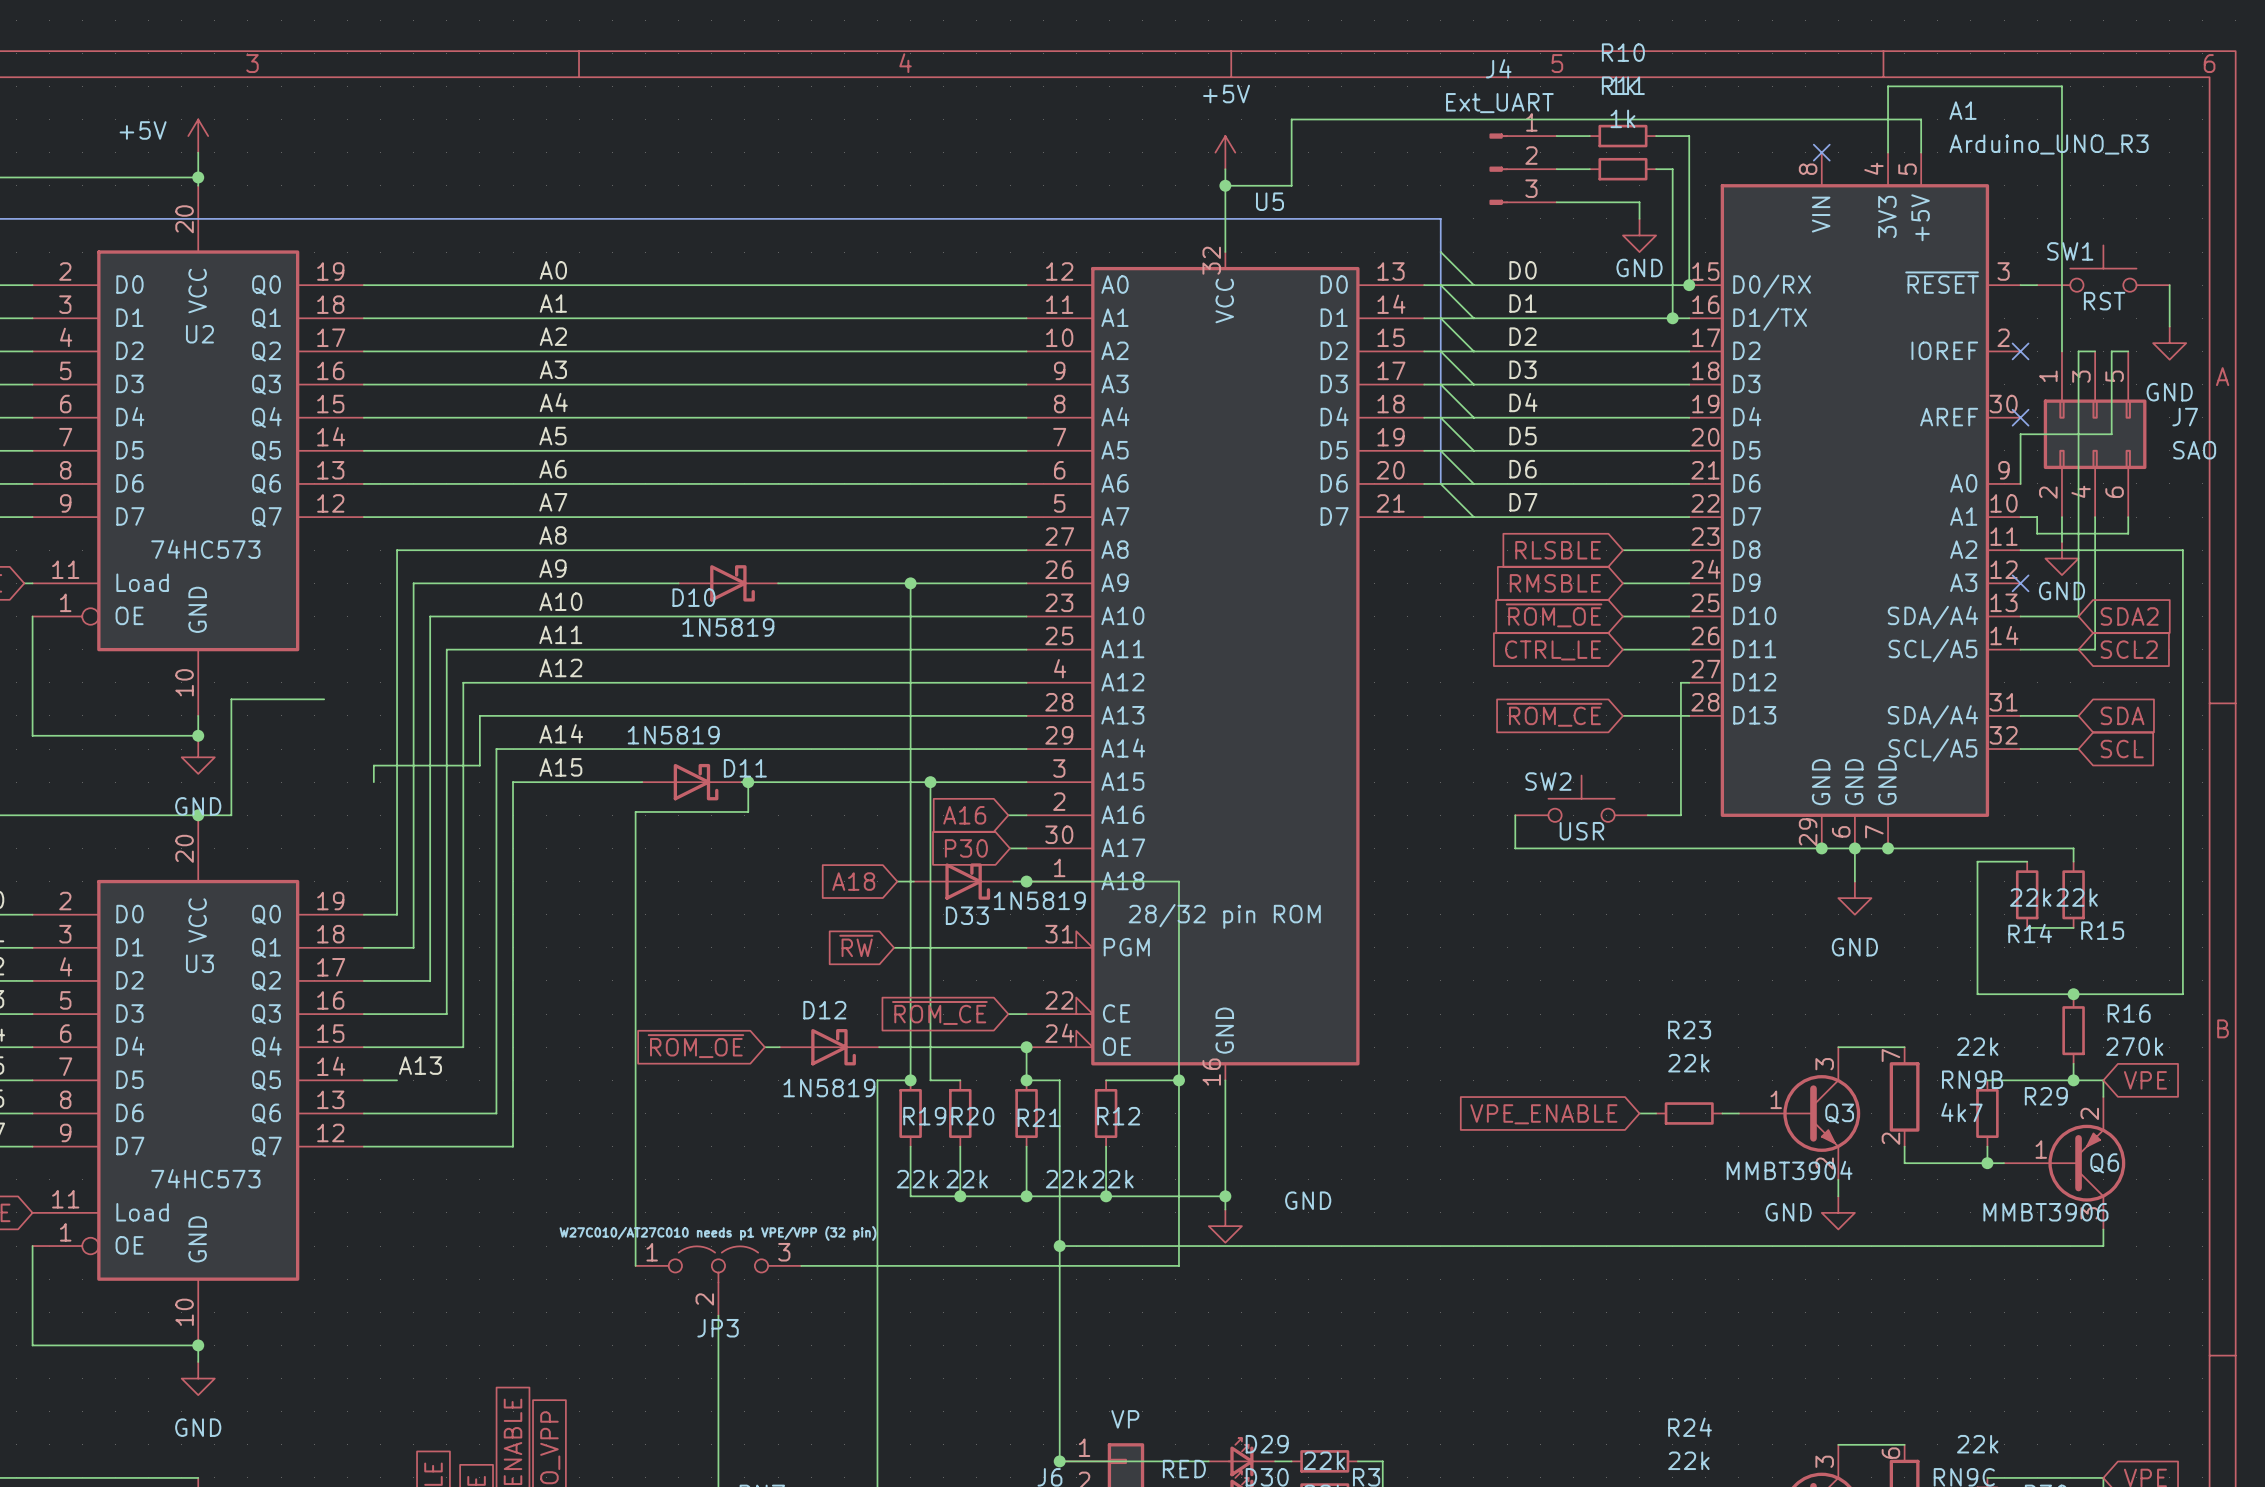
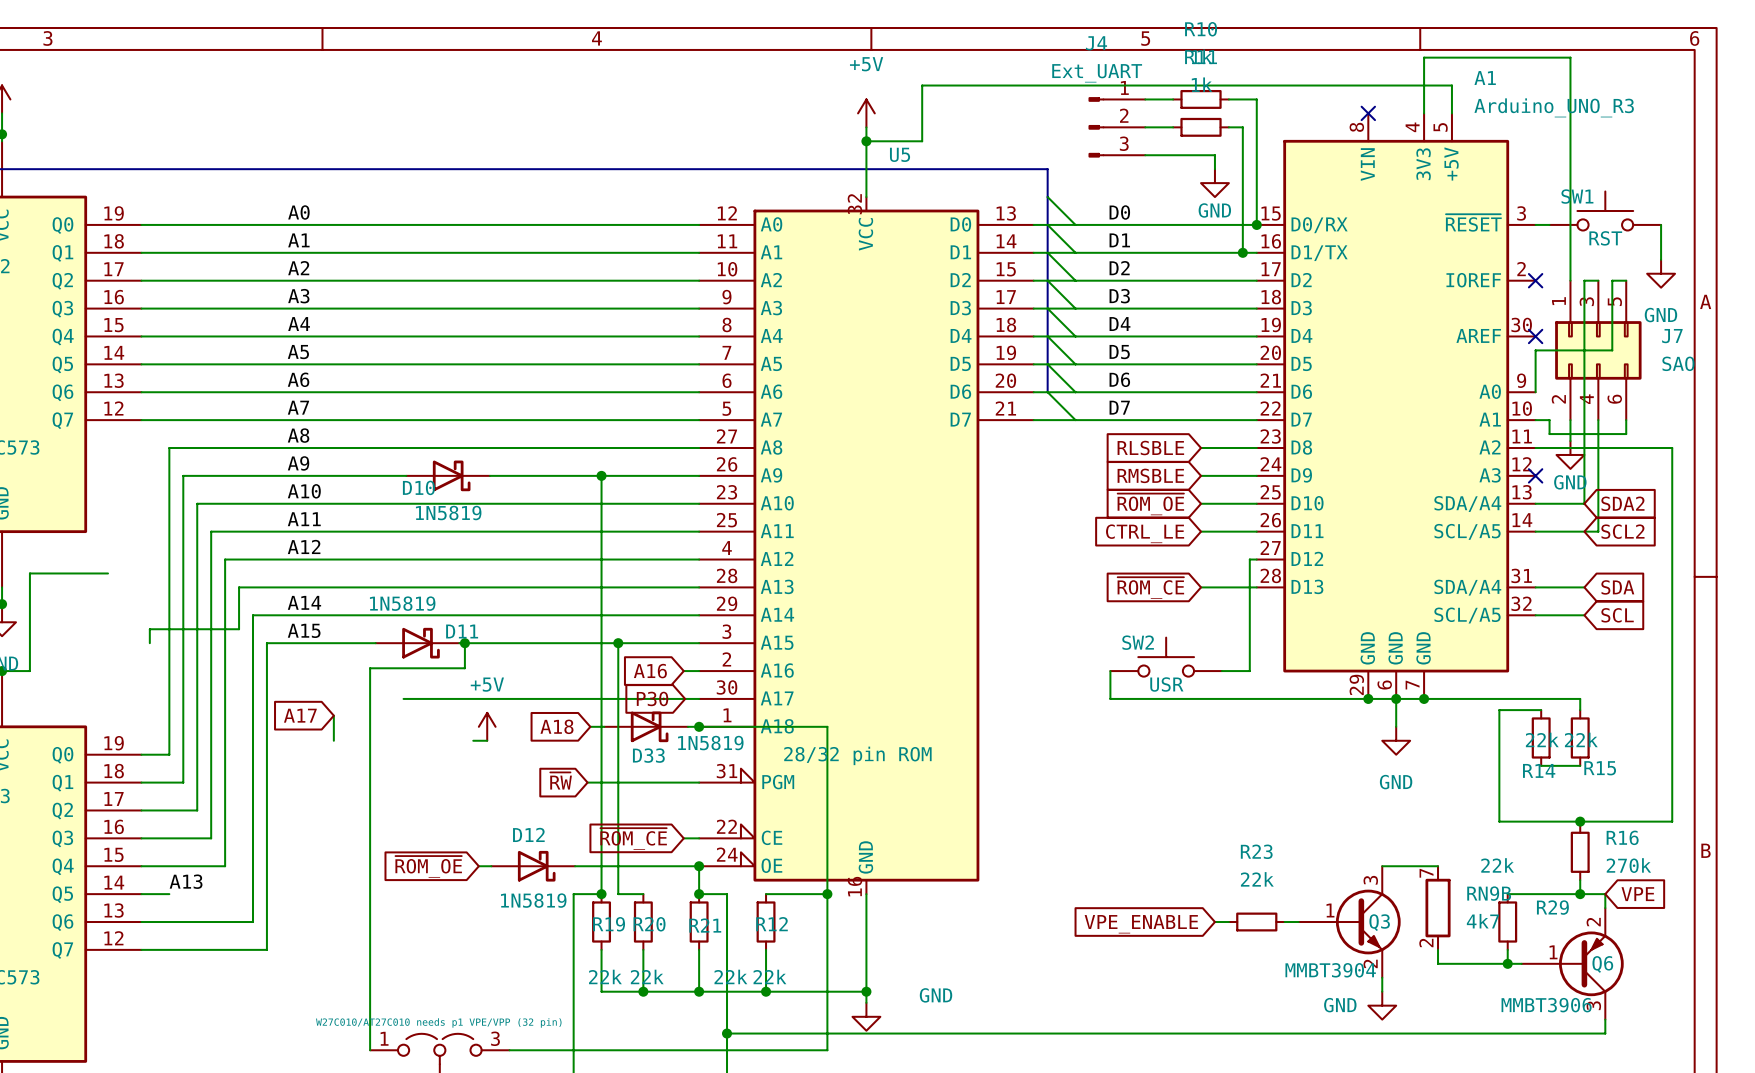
wire: none -> (403, 698) (685, 698)
global label: none -> A17 (300, 715)
wire: none -> (333, 715) (333, 740)
power symbol: none -> +5V (487, 726)
wire: none -> (473, 740) (487, 740)

